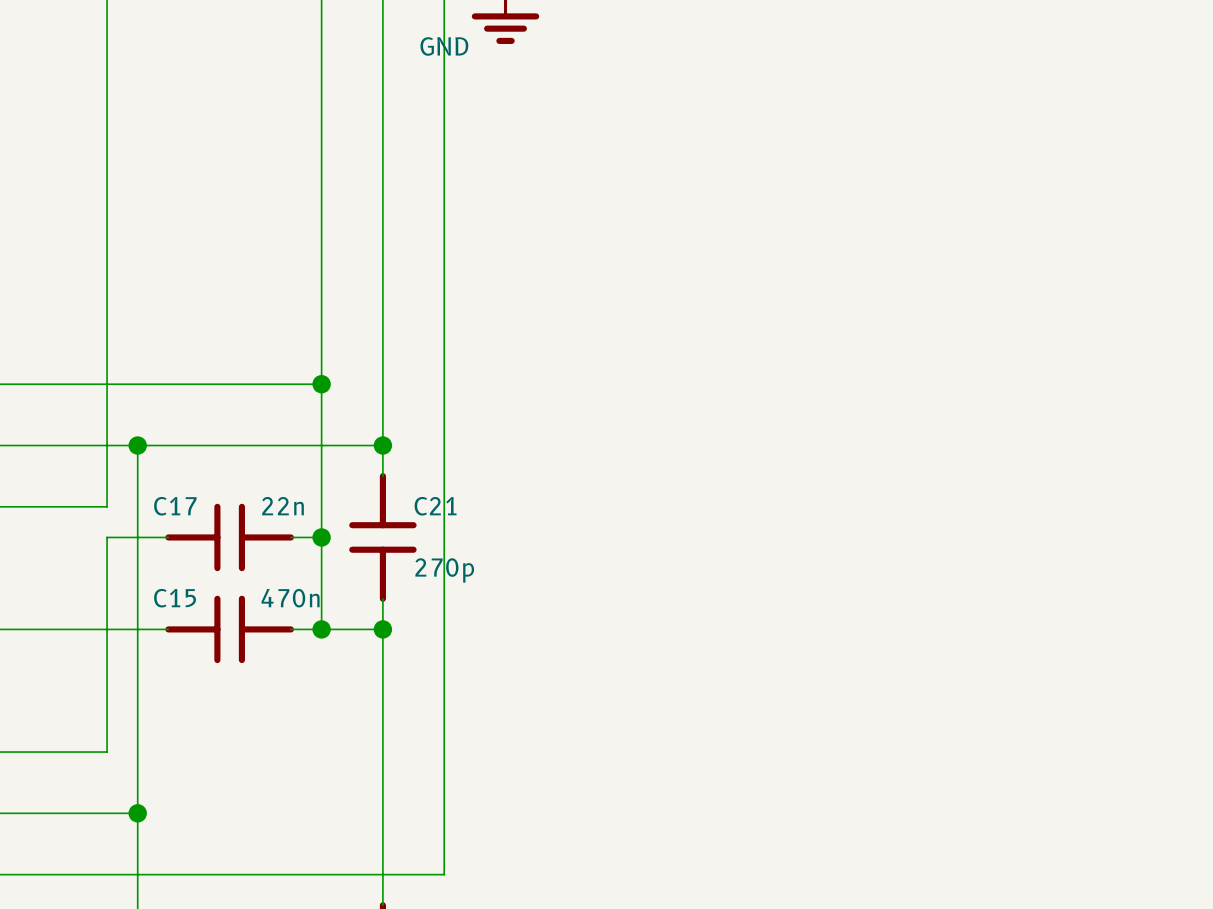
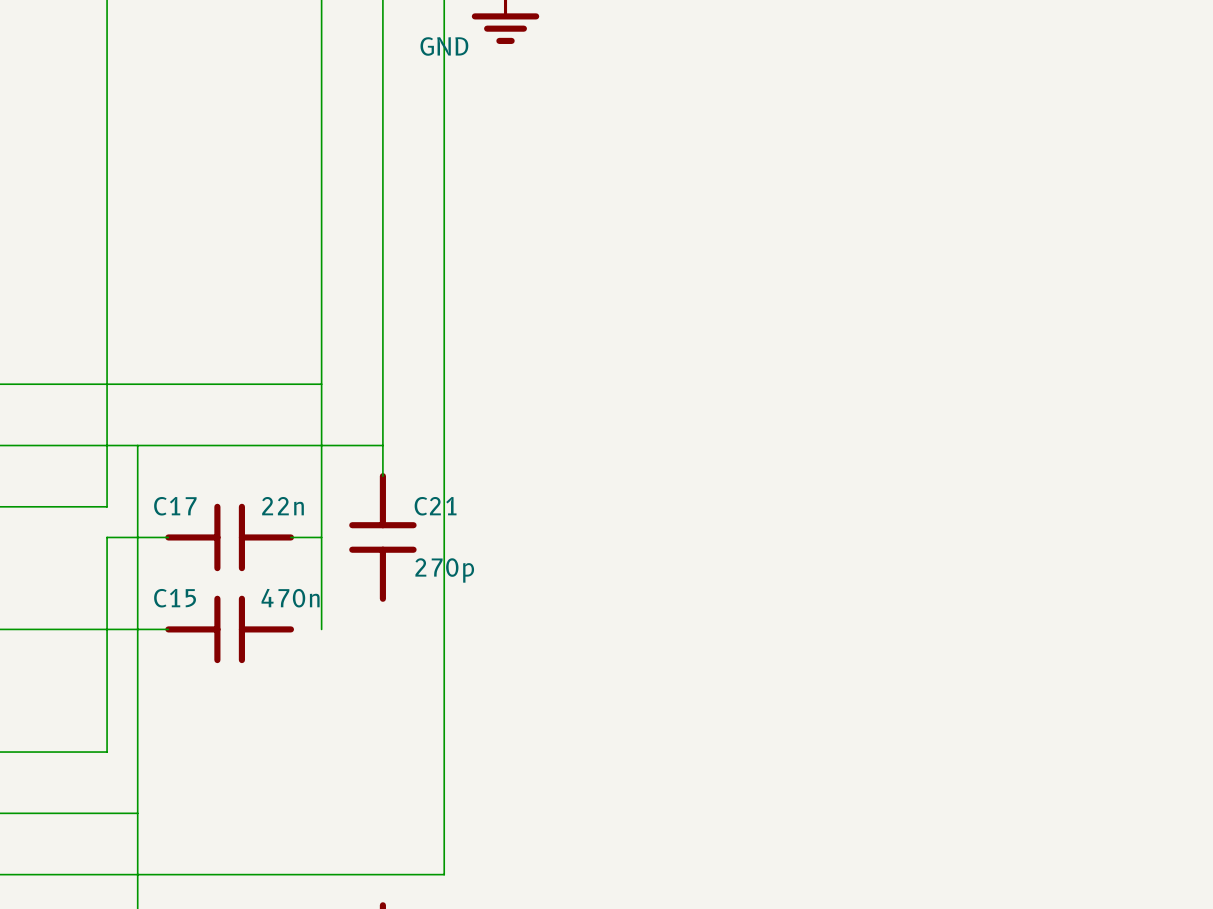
junction: (321, 384) -> none
junction: (137, 445) -> none
junction: (382, 445) -> none
junction: (321, 537) -> none
wire: (382, 598) (382, 905) -> none
wire: (290, 629) (382, 629) -> none
junction: (321, 629) -> none
junction: (382, 629) -> none
junction: (137, 813) -> none

